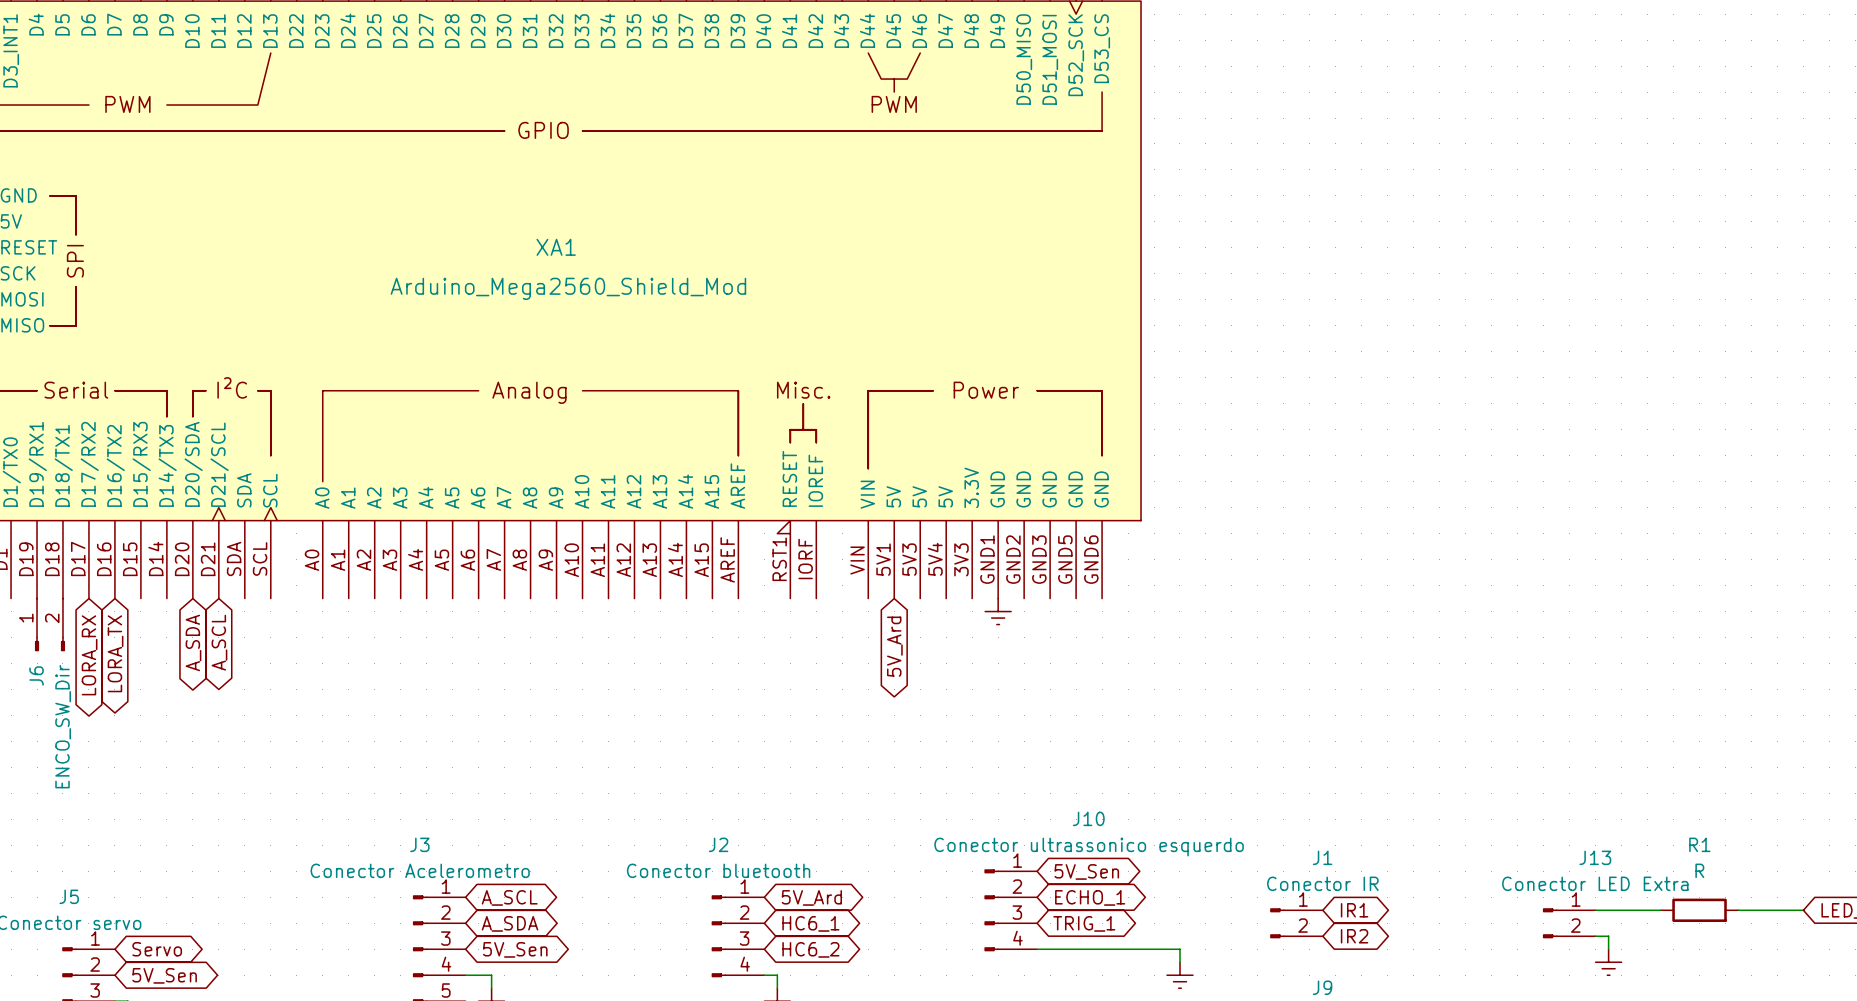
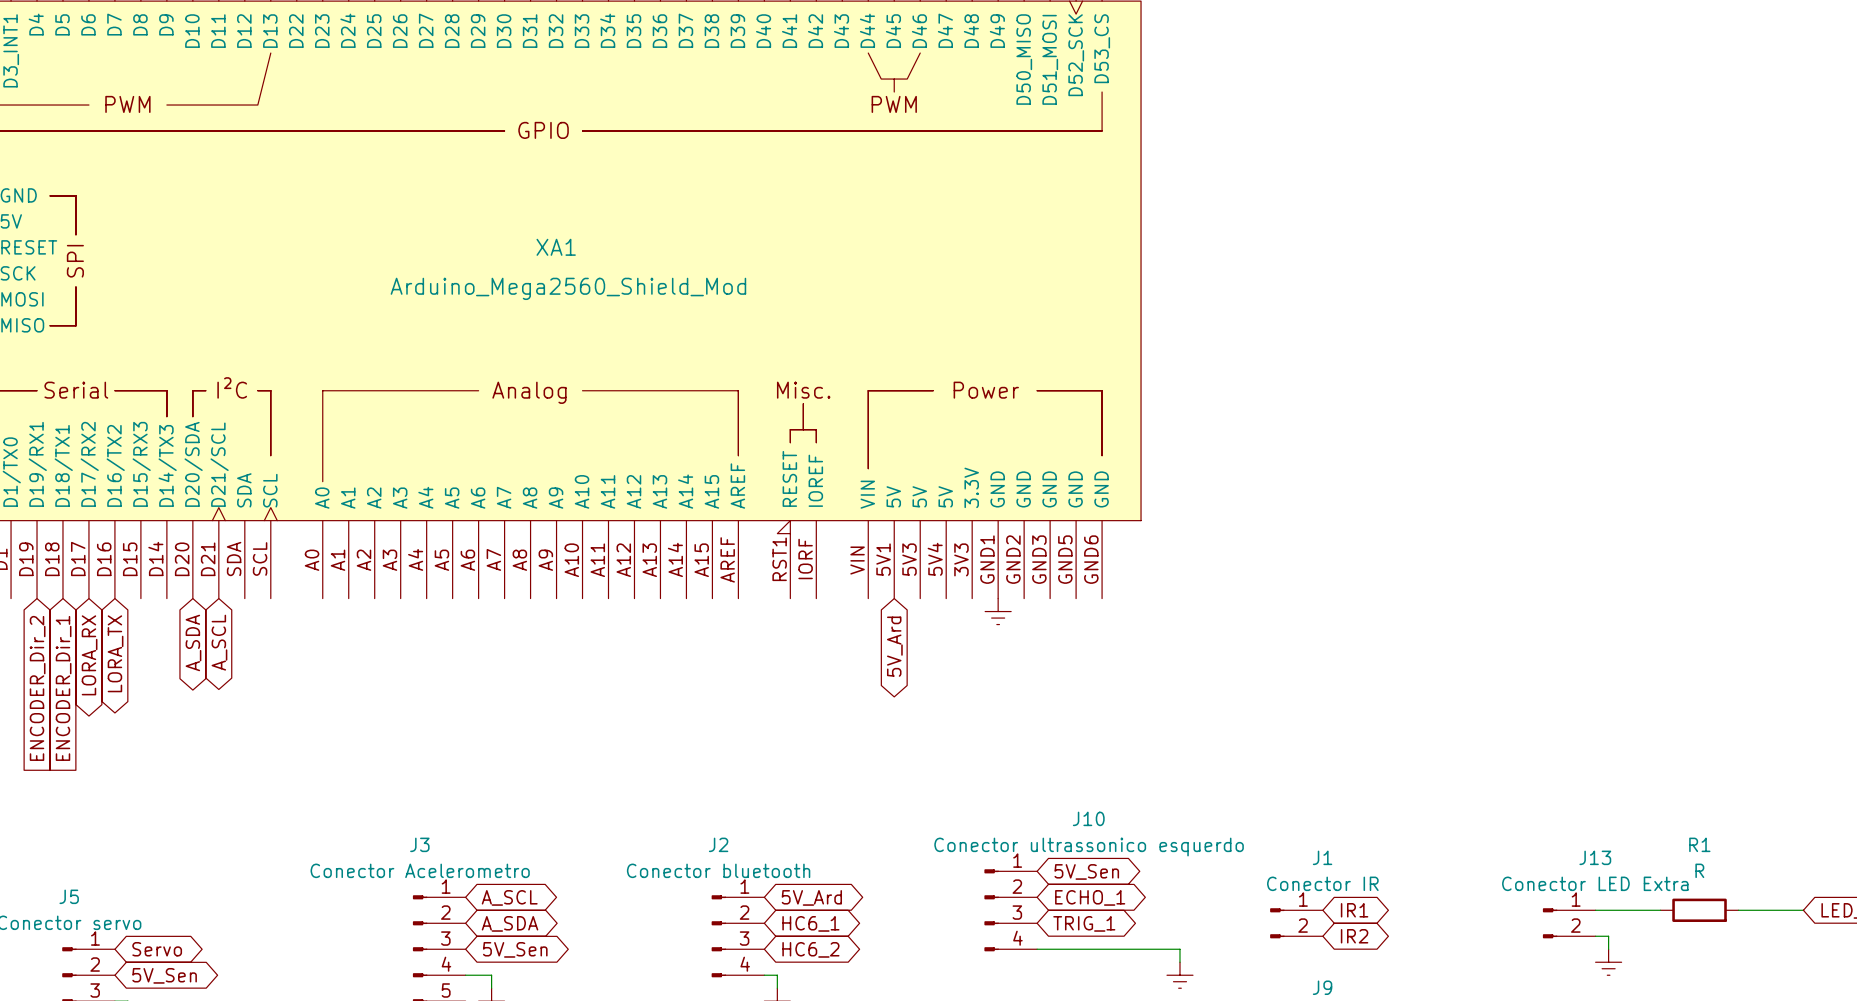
J6: ENCO_SW_Dir (49, 624) -> none
global label: none -> ENCODER_Dir_2 (37, 688)
global label: none -> ENCODER_Dir_1 (63, 688)

